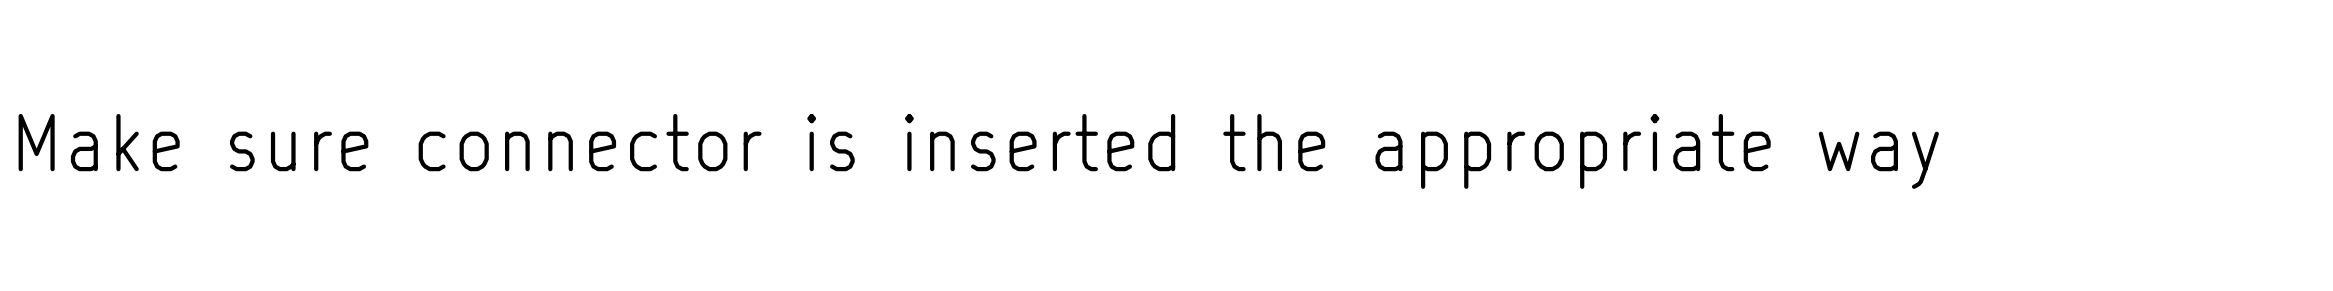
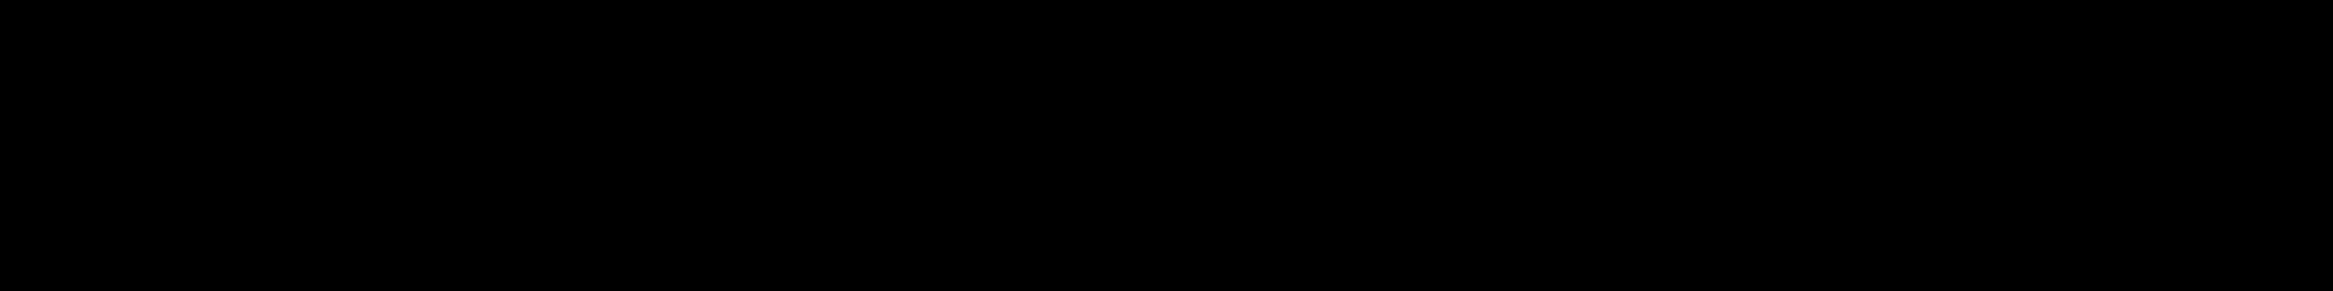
text: Make sure connector is inserted the appropriate way (978, 151) -> none

